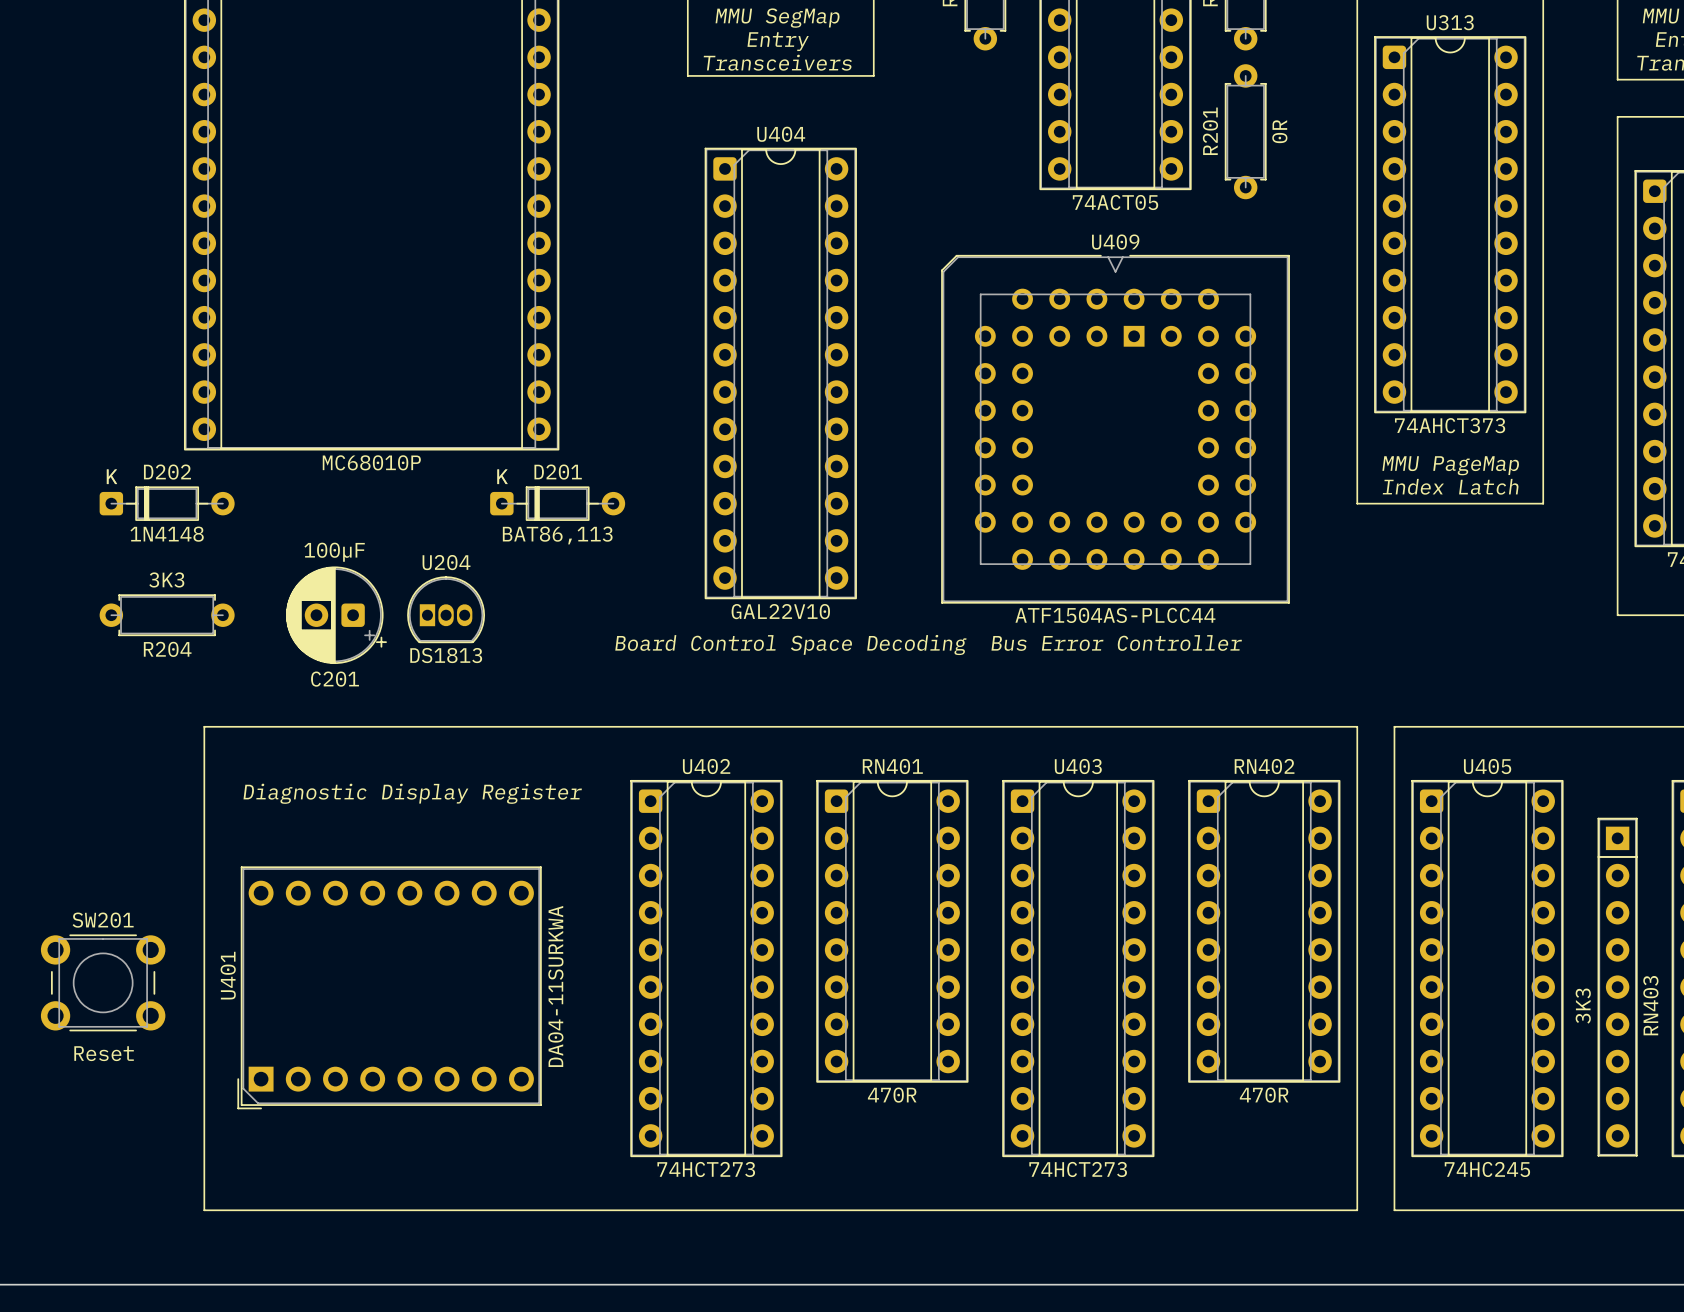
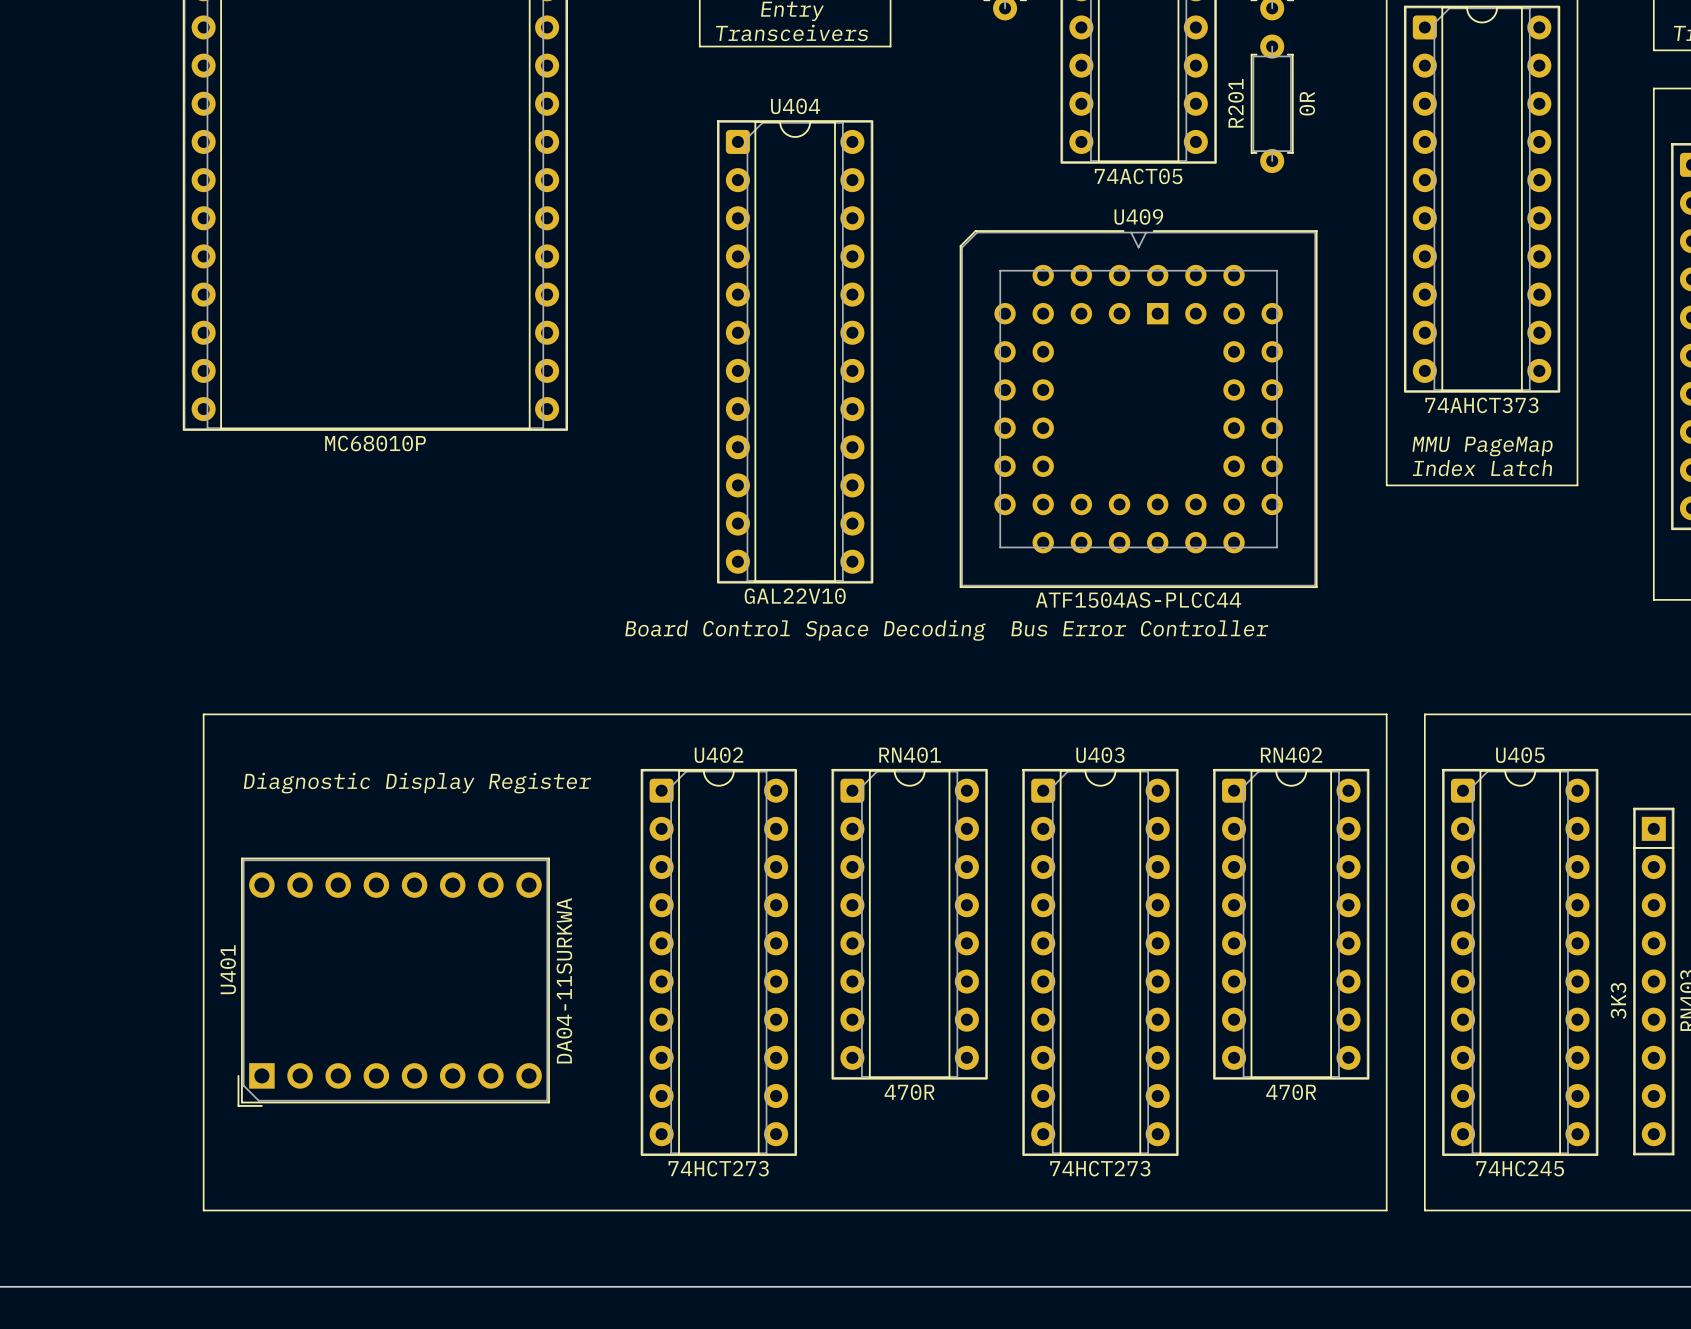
D202: 1N4148 (167, 503) -> none
D201: BAT86,113 (557, 503) -> none
U204: DS1813 (446, 609) -> none
R204: 3K3 (167, 615) -> none
C201: 100µF (336, 615) -> none
SW201: Reset (103, 982) -> none

